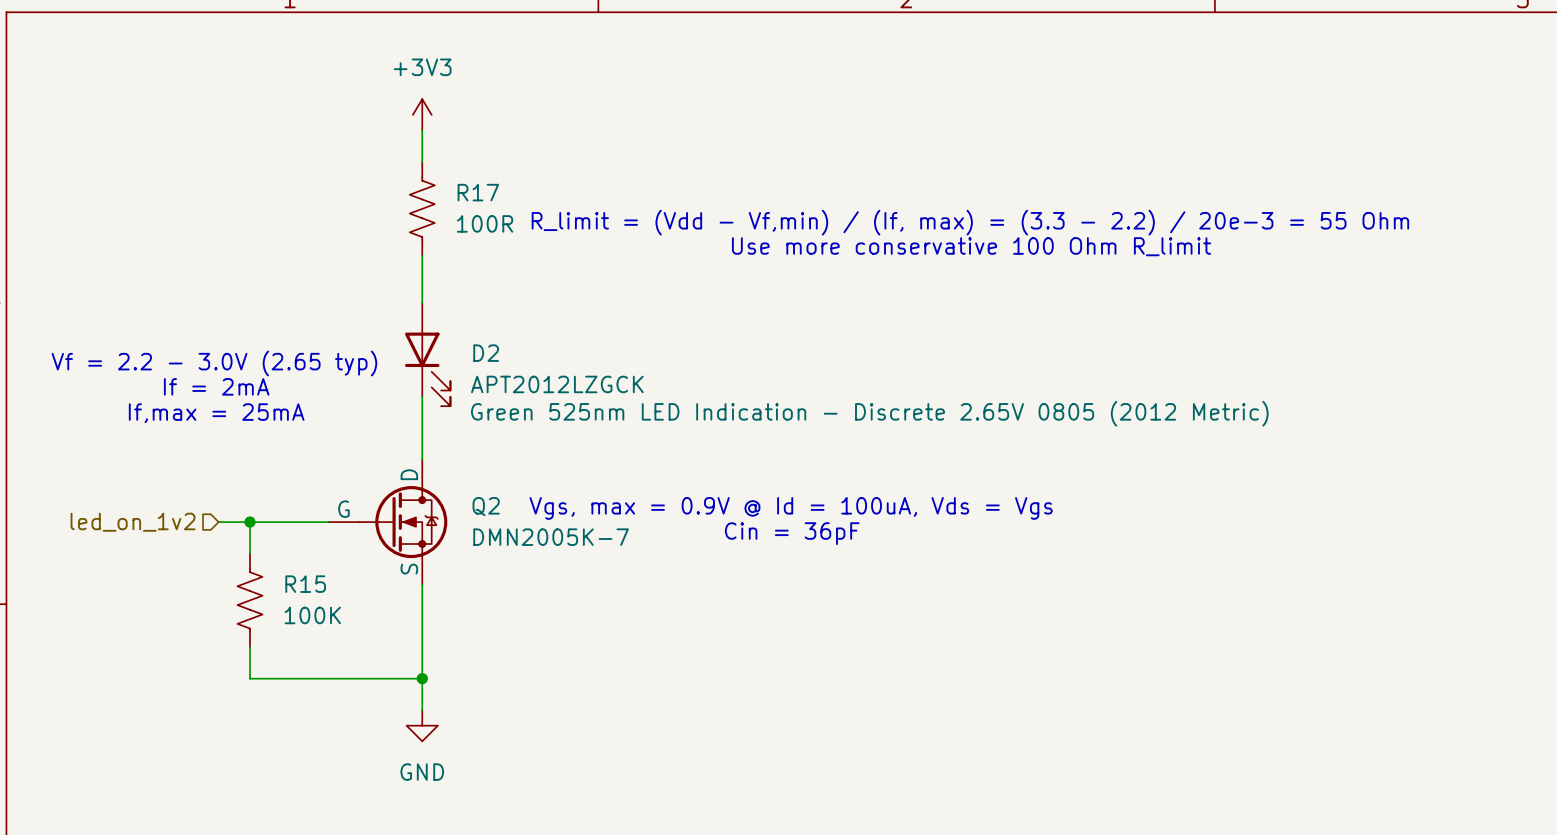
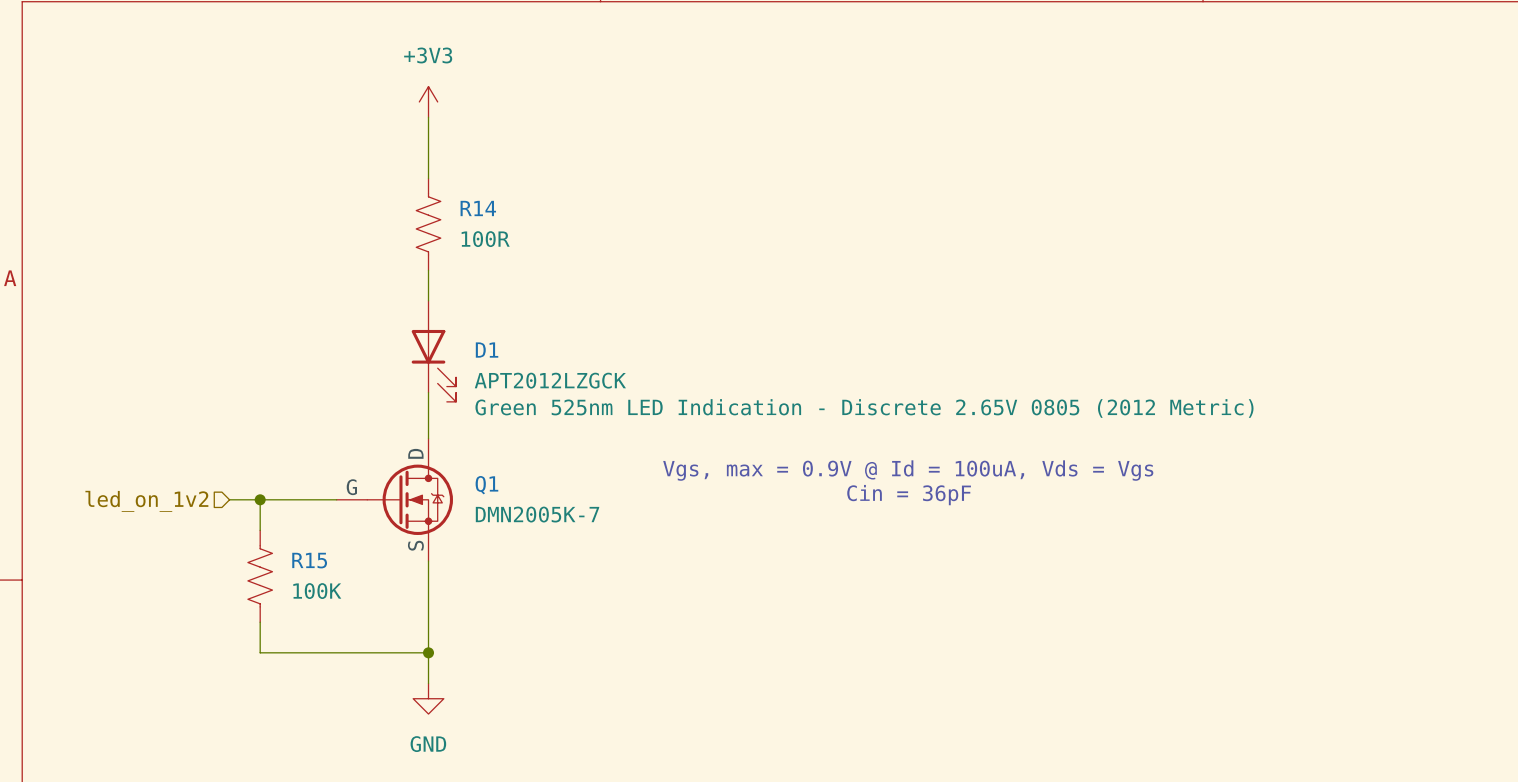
R17: 100R (422, 208) -> none
text: R_limit = (Vdd - Vf,min) / (If, max) = (3.3 - 2.2) / 20e-3 = 55 Ohm (970, 222) -> none
R14: none -> 100R (428, 224)
text: Use more conservative 100 Ohm R_limit (971, 246) -> none
D2: APT2012LZGCK (427, 354) -> none
text: Vf = 2.2 - 3.0V (2.65 typ) (214, 363) -> none
D1: none -> APT2012LZGCK (433, 351)
text: If = 2mA (216, 386) -> none
text: If,max = 25mA (216, 413) -> none
Q2 name: Q2 (486, 506) -> Q1 (486, 485)
text position: Vgs, max = 0.9V @ Id = 100uA, Vds = Vgs (791, 508) -> Vgs, max = 0.9V @ Id = 100uA, Vds = Vgs (908, 470)
text position: Cin = 36pF (792, 533) -> Cin = 36pF (909, 495)

